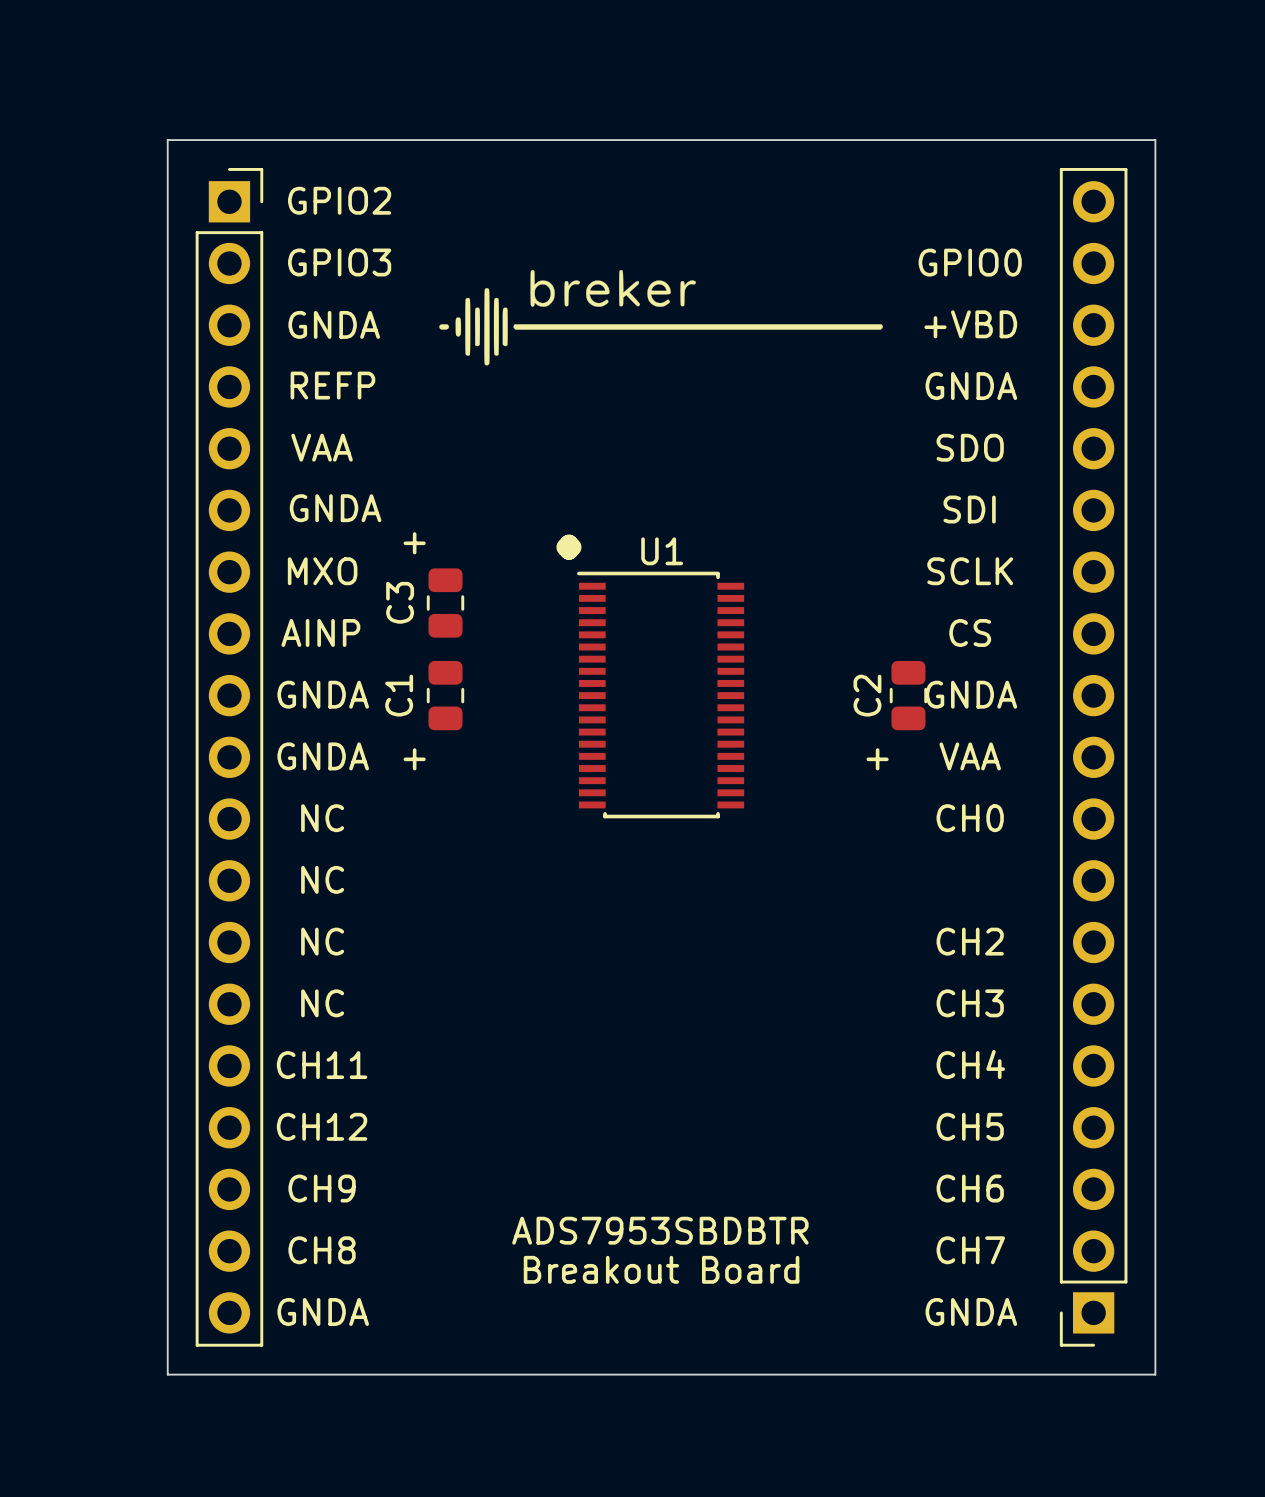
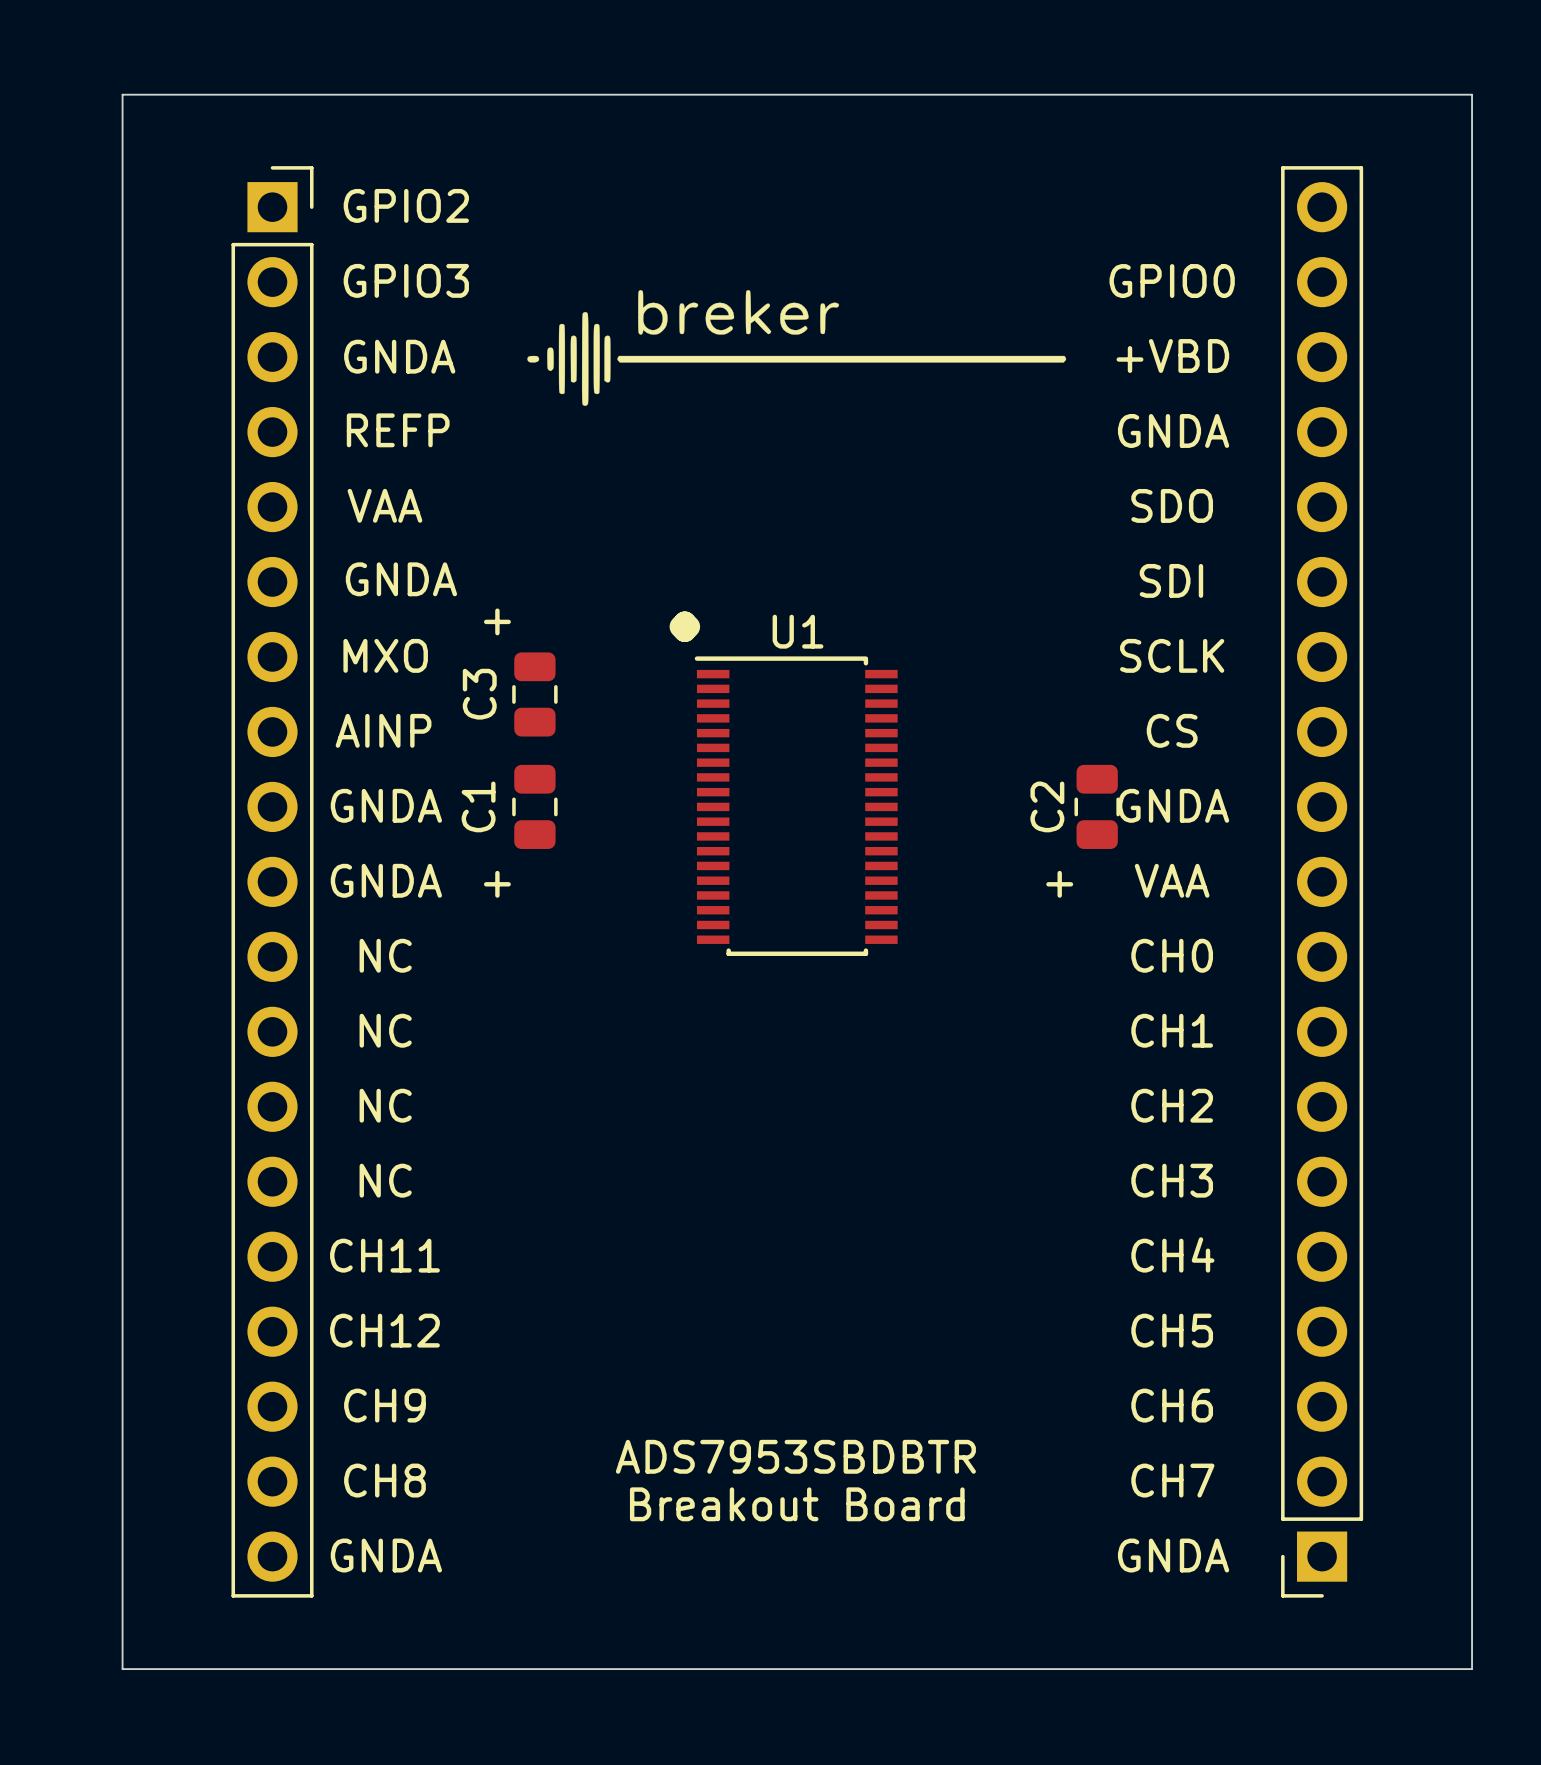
board edge: (167, 140) (1155, 140) (1155, 1374) (167, 1374) (167, 140) -> (122, 94) (122, 1669) (1472, 1669) (1472, 94) (122, 94)
text: none -> CH1 (1172, 1030)

